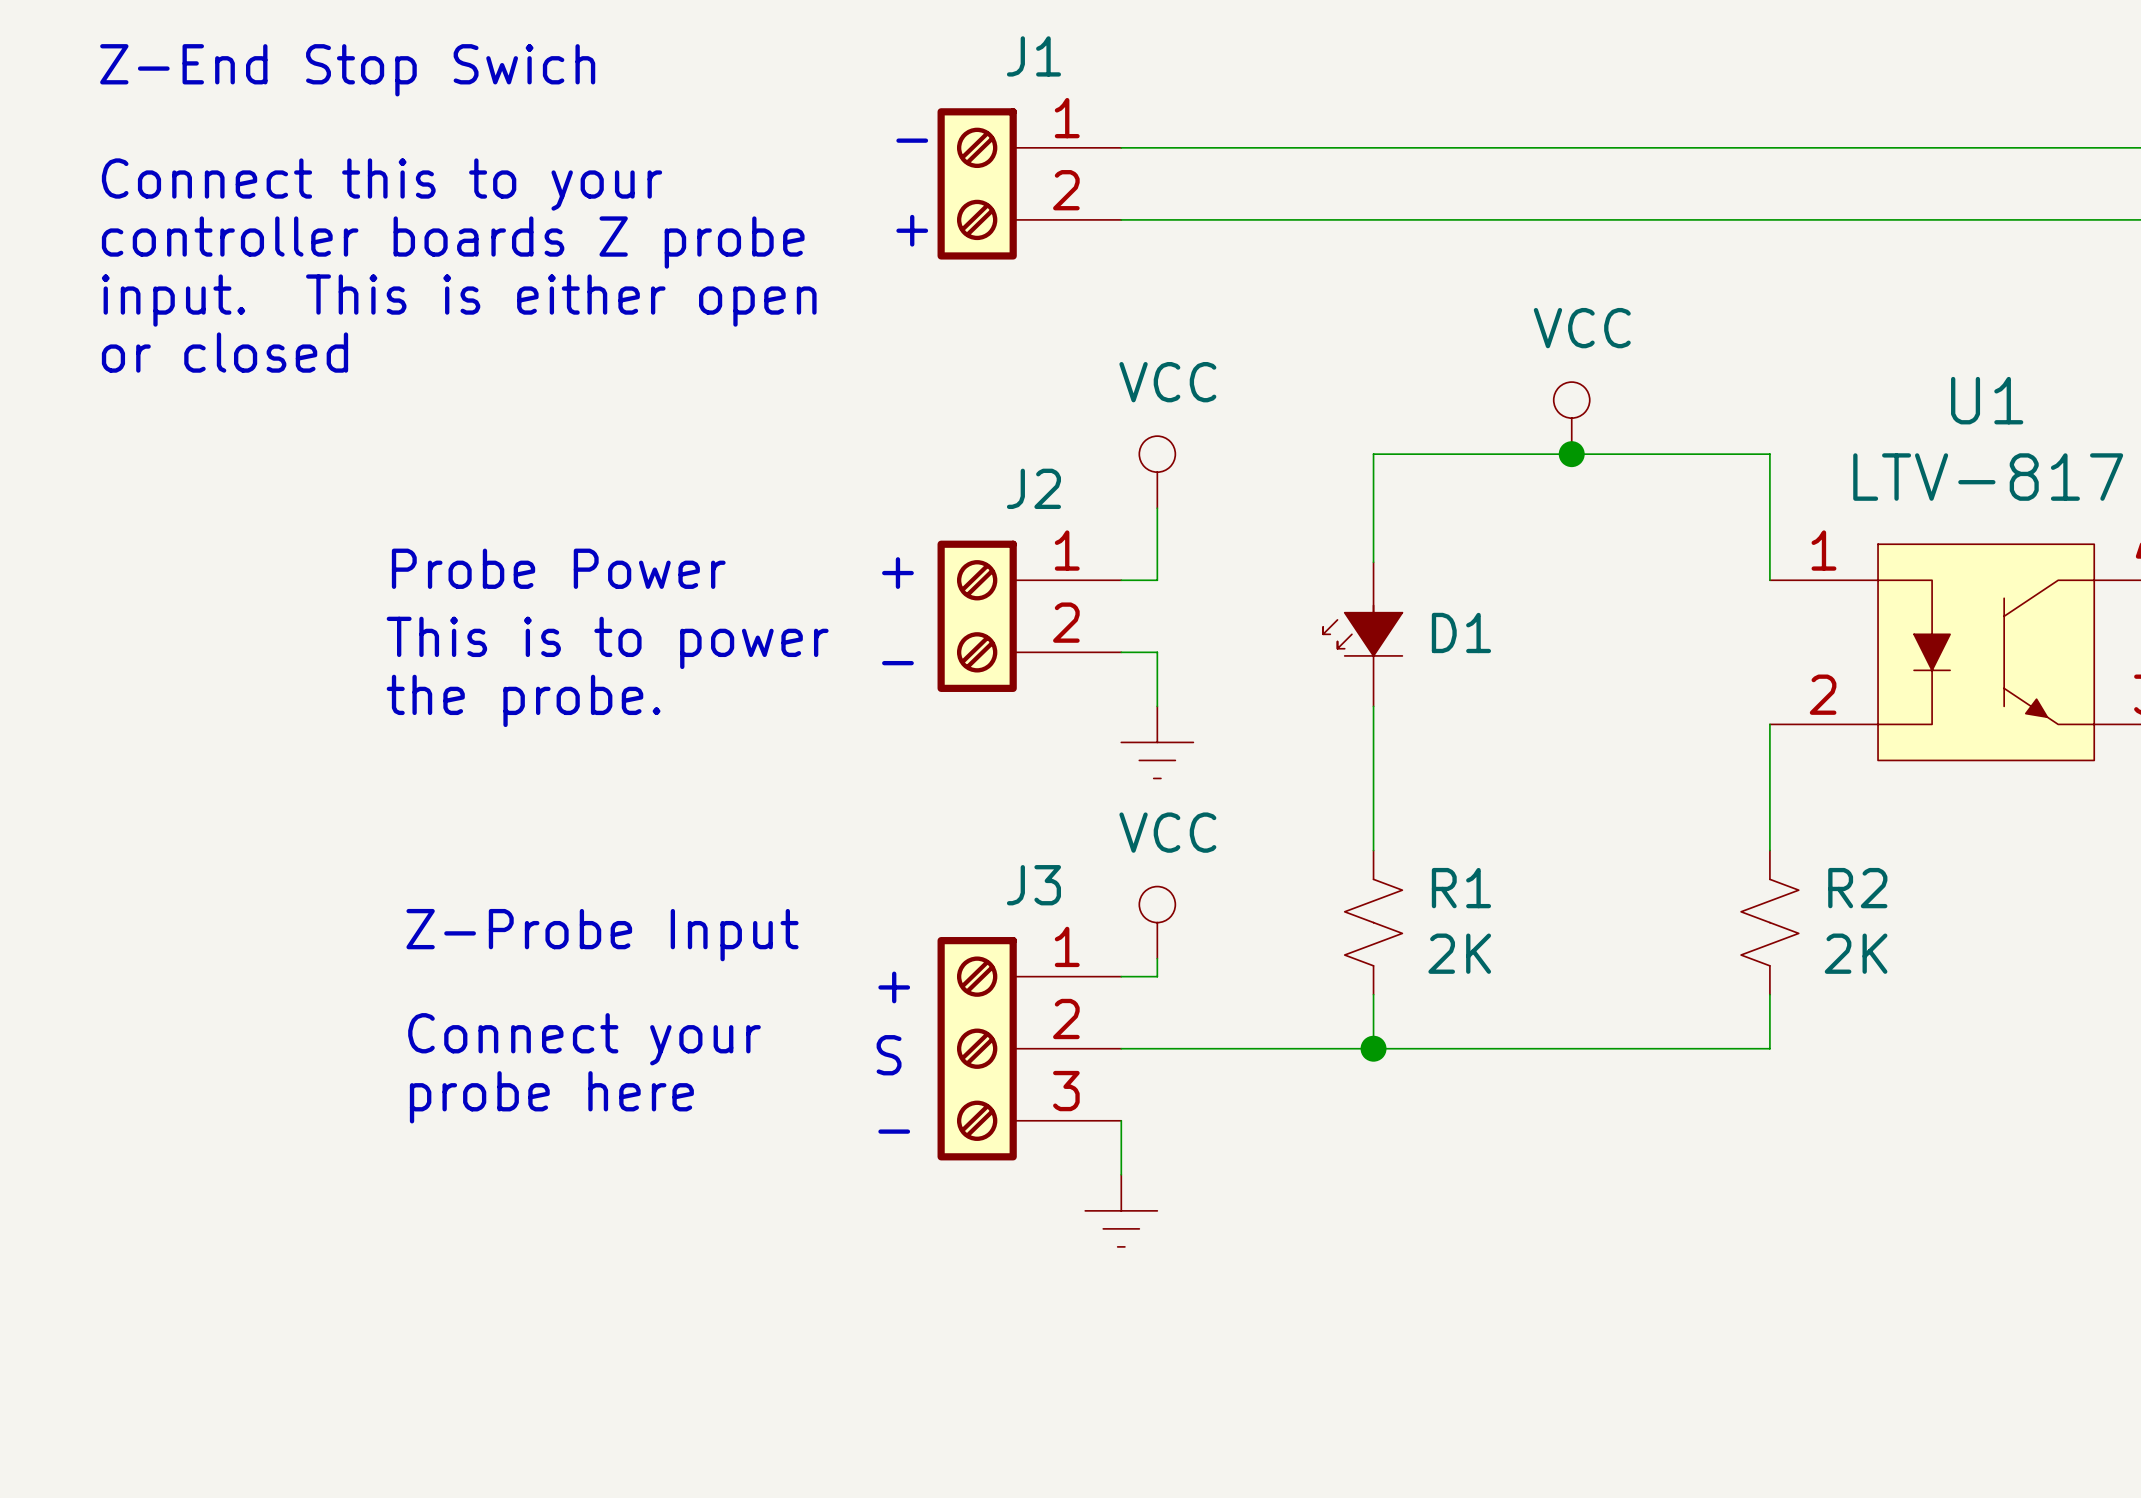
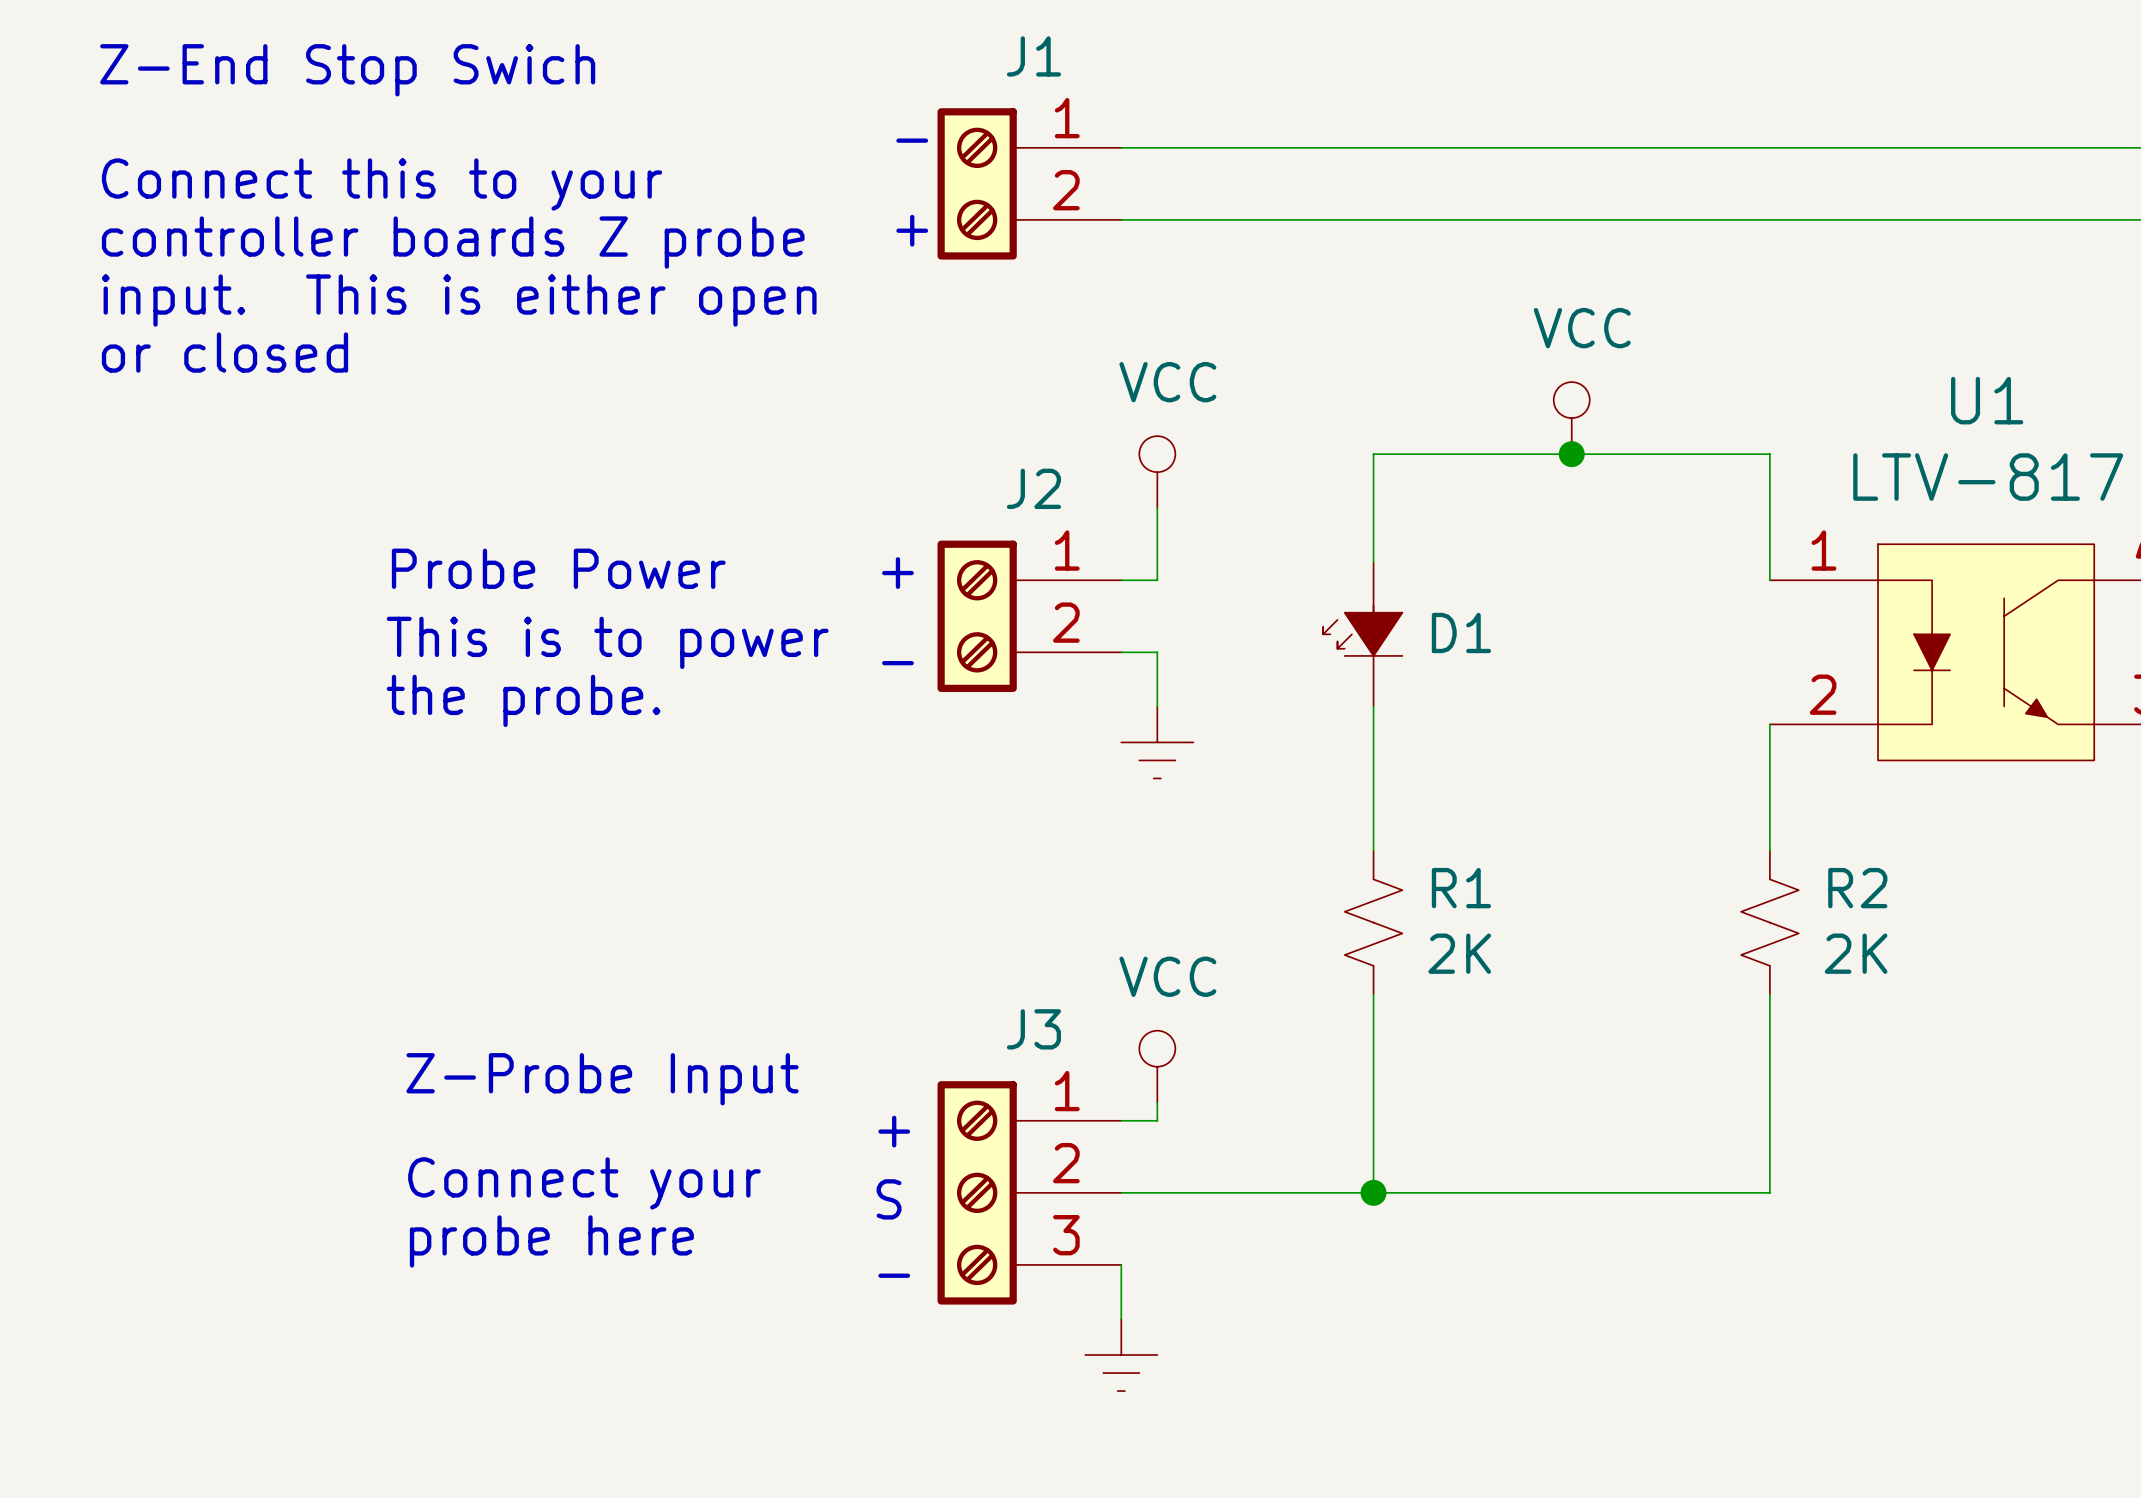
power symbol position: VCC (1157, 922) -> VCC (1157, 1066)
text position: Z-Probe Input (602, 935) -> Z-Probe Input (602, 1079)
wire: (1157, 958) (1157, 976) (1121, 976) -> none
text: + (894, 987) -> none
text position: Connect your (584, 1039) -> Connect your (584, 1183)
J3 position: (1029, 1048) -> (1029, 1192)
wire: (1121, 1048) (1769, 1048) -> (1121, 1192) (1769, 1192) (1769, 1048)
wire: none -> (1373, 1048) (1373, 1192)
junction position: (1373, 1048) -> (1373, 1192)
text position: S (889, 1055) -> S (889, 1199)
text position: probe here (551, 1097) -> probe here (551, 1241)
wire: (1121, 1120) (1121, 1174) -> (1121, 1120) (1157, 1120) (1157, 1102)
text: - (894, 1131) -> + (894, 1131)
power symbol position: (1121, 1210) -> (1121, 1355)
wire: none -> (1121, 1264) (1121, 1318)
text: none -> - (894, 1275)

